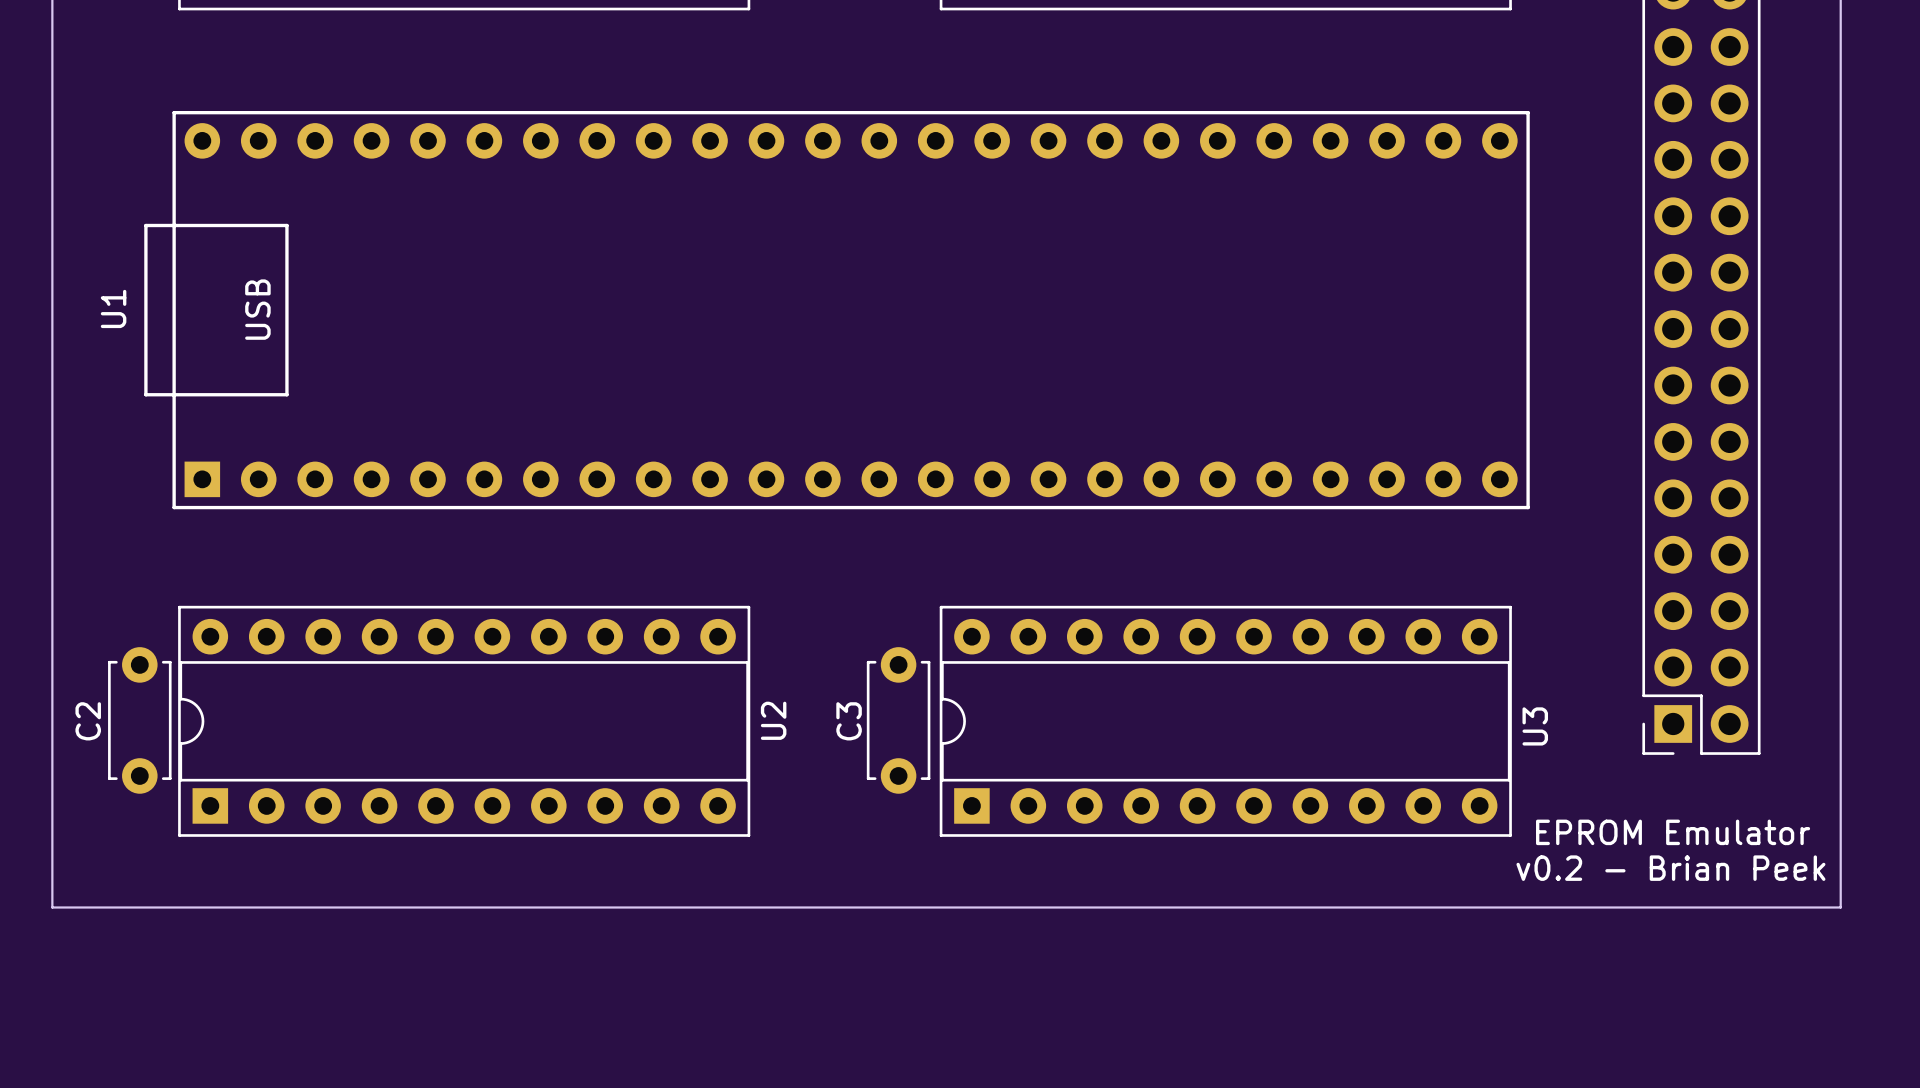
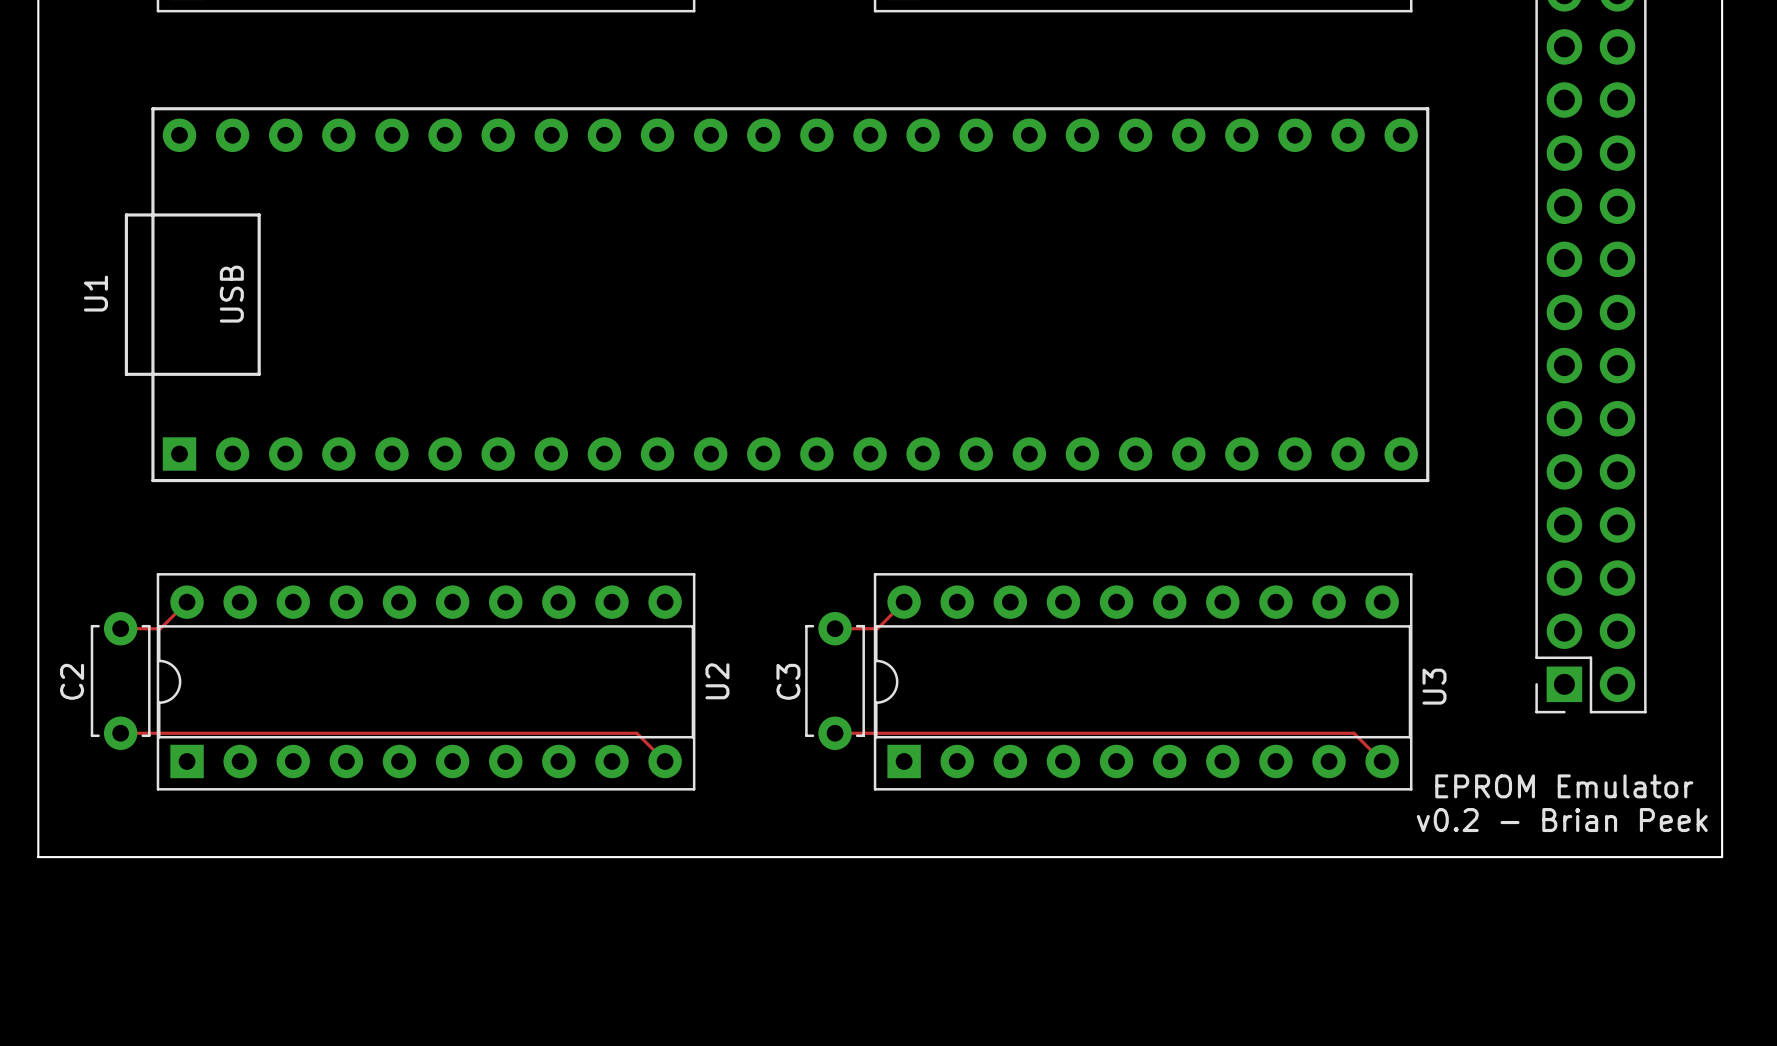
track: none -> (187, 602) (160, 628) (120, 628)
track: none -> (904, 602) (877, 628) (835, 628)
track: none -> (120, 733) (636, 733) (665, 761)
track: none -> (835, 733) (1353, 733) (1382, 761)

